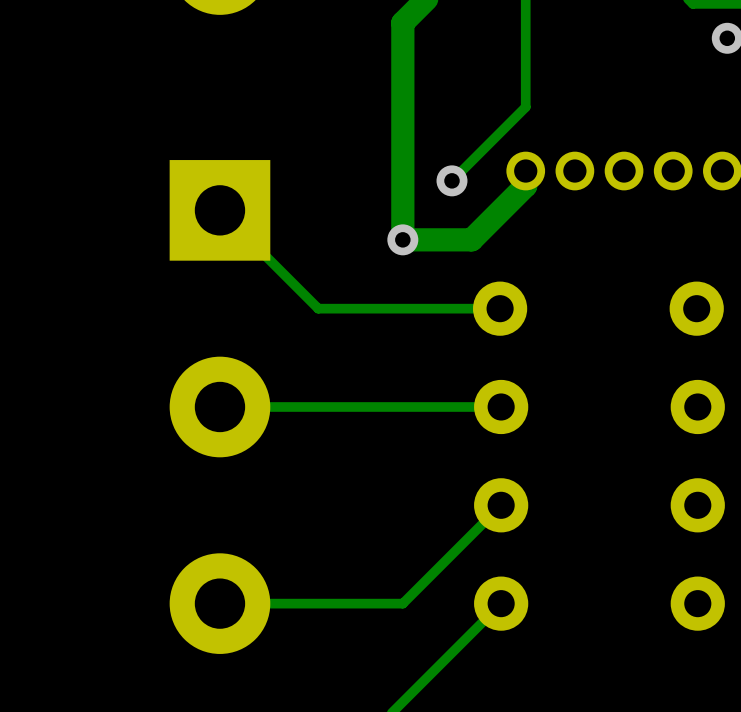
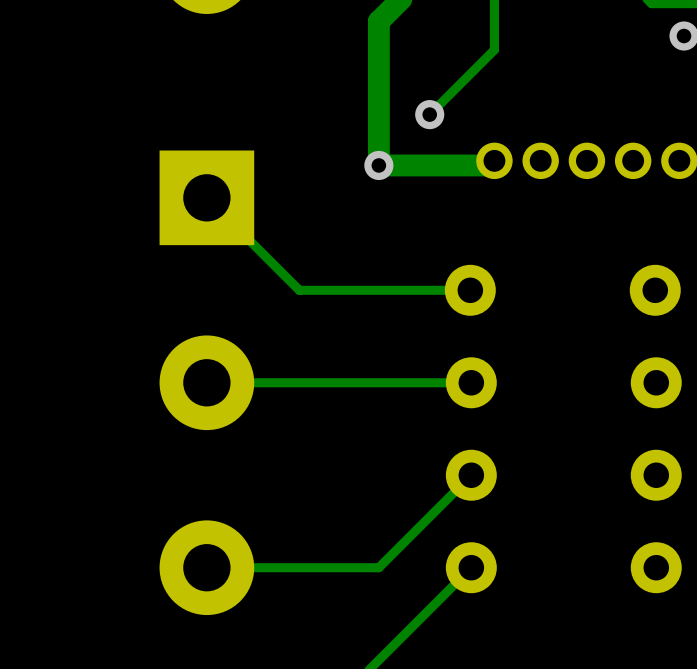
track: (525, 53) (525, 107) (451, 180) -> (494, 49) (429, 114)
via: none -> (429, 114)
track: (525, 171) (525, 185) (471, 239) (402, 239) (402, 175) -> (494, 160) (489, 165) (378, 165)
via: none -> (378, 165)
via: (451, 180) -> none
via: (402, 239) -> none

